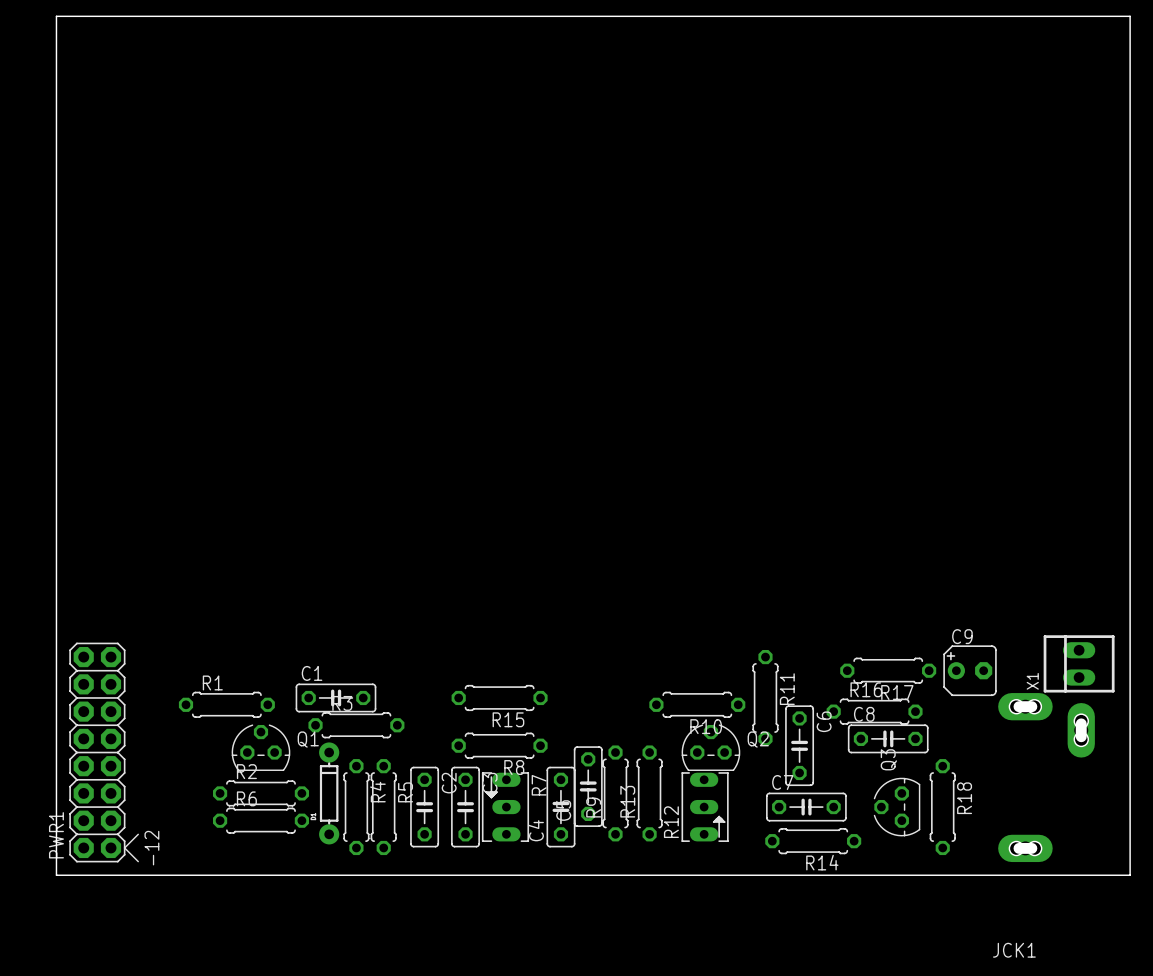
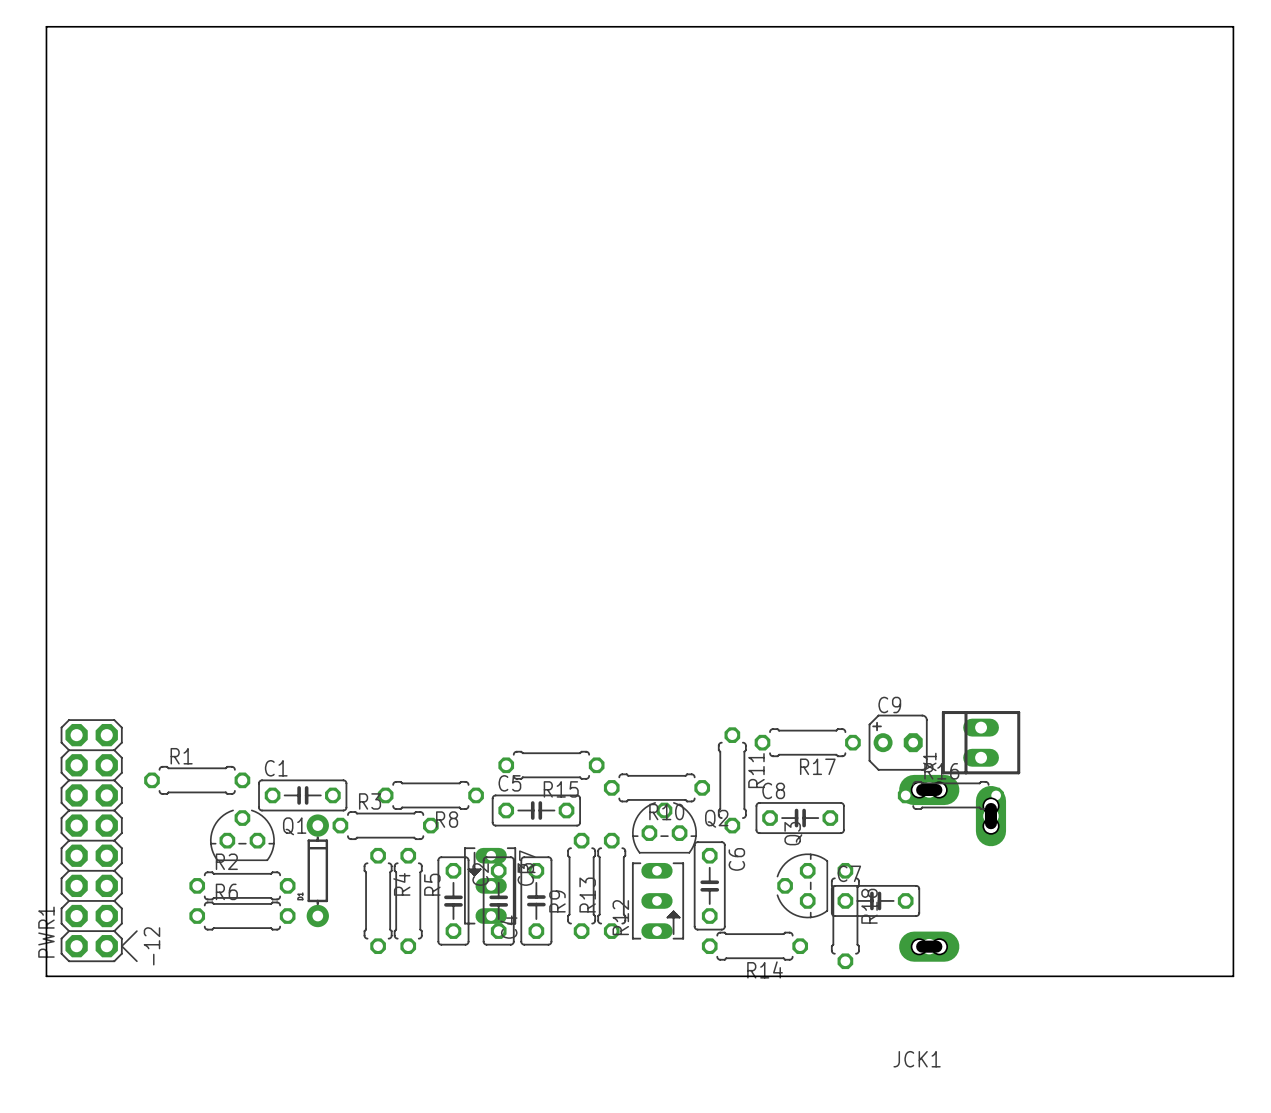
X1 position: (1079, 663) -> (981, 742)
R17 position: (888, 670) -> (807, 742)
C9 position: (970, 670) -> (898, 742)
C1 position: (335, 697) -> (302, 795)
R15 position: (499, 697) -> (551, 765)
R11 position: (765, 697) -> (732, 780)
R1 position: (226, 704) -> (197, 780)
R10 position: (697, 704) -> (656, 787)
R3 position: (356, 725) -> (385, 825)
C8 position: (888, 738) -> (800, 818)
R8 position: (499, 745) -> (430, 795)
C6 position: (799, 745) -> (709, 885)
Q1 position: (260, 747) -> (242, 835)
Q2 position: (710, 747) -> (664, 827)
JCK1 position: (1046, 777) -> (952, 868)
C5 rotation: 0° (588, 786) -> 90° clockwise (536, 810)
C5 position: (588, 786) -> (536, 810)
R2 position: (260, 793) -> (242, 885)
part position: (329, 793) -> (317, 870)
R9 position: (615, 793) -> (581, 885)
R13 position: (649, 793) -> (611, 885)
R7 position: (505, 807) -> (490, 885)
C4 position: (560, 807) -> (536, 900)
R12 position: (705, 807) -> (658, 900)
Q3 position: (897, 807) -> (802, 885)
R18 position: (942, 807) -> (845, 916)
R6 position: (260, 820) -> (242, 916)
R14 position: (813, 841) -> (754, 946)

